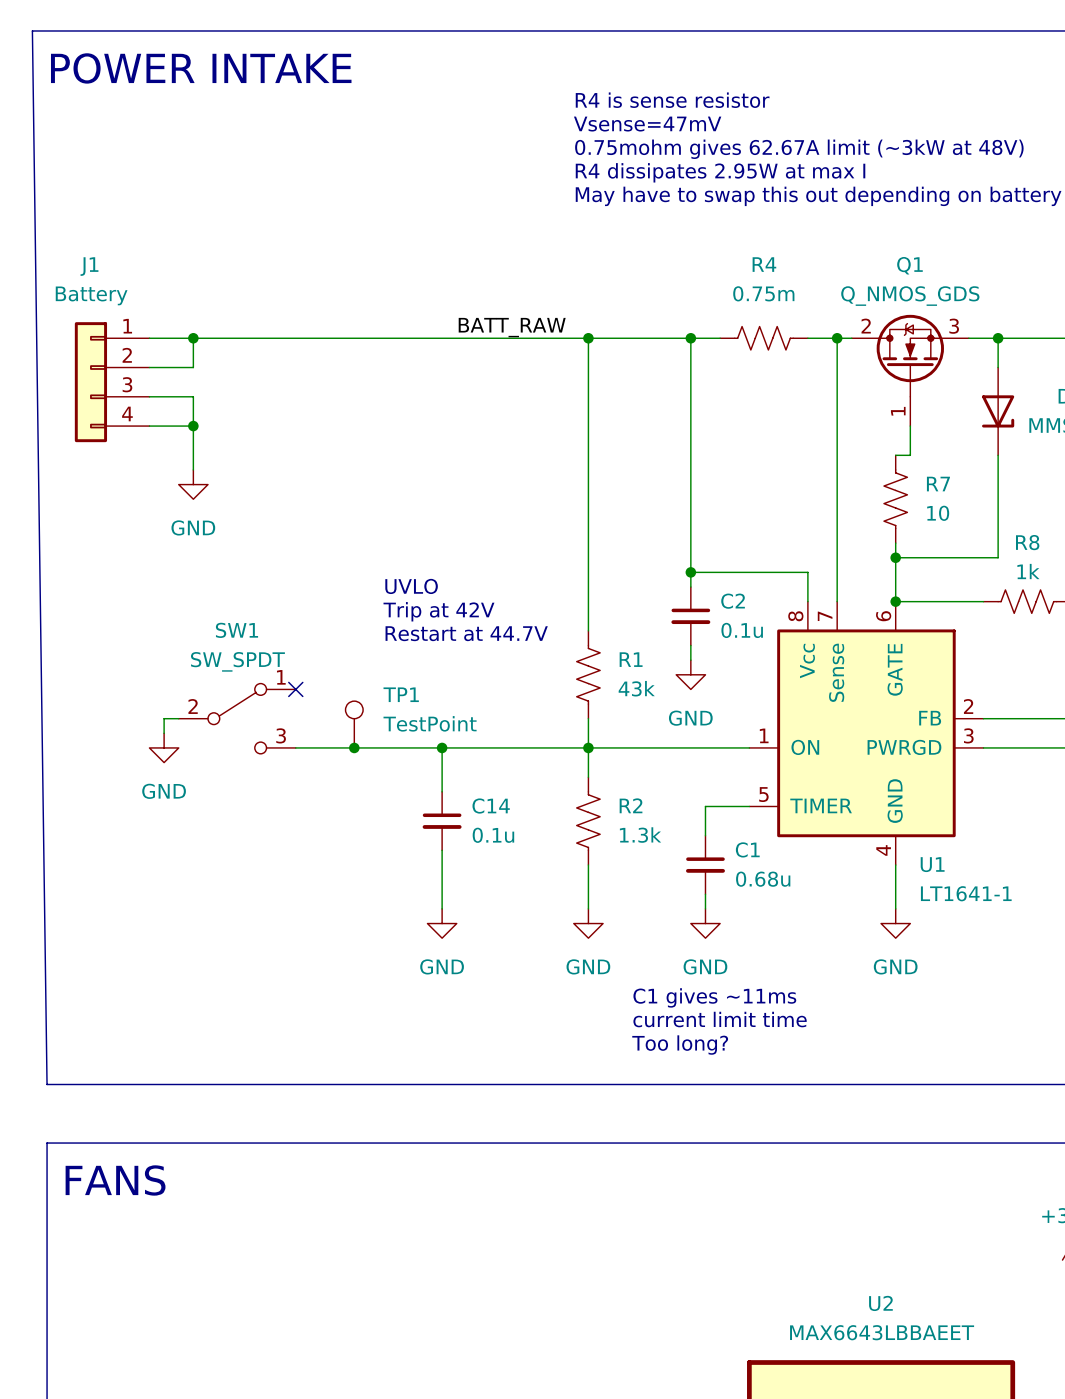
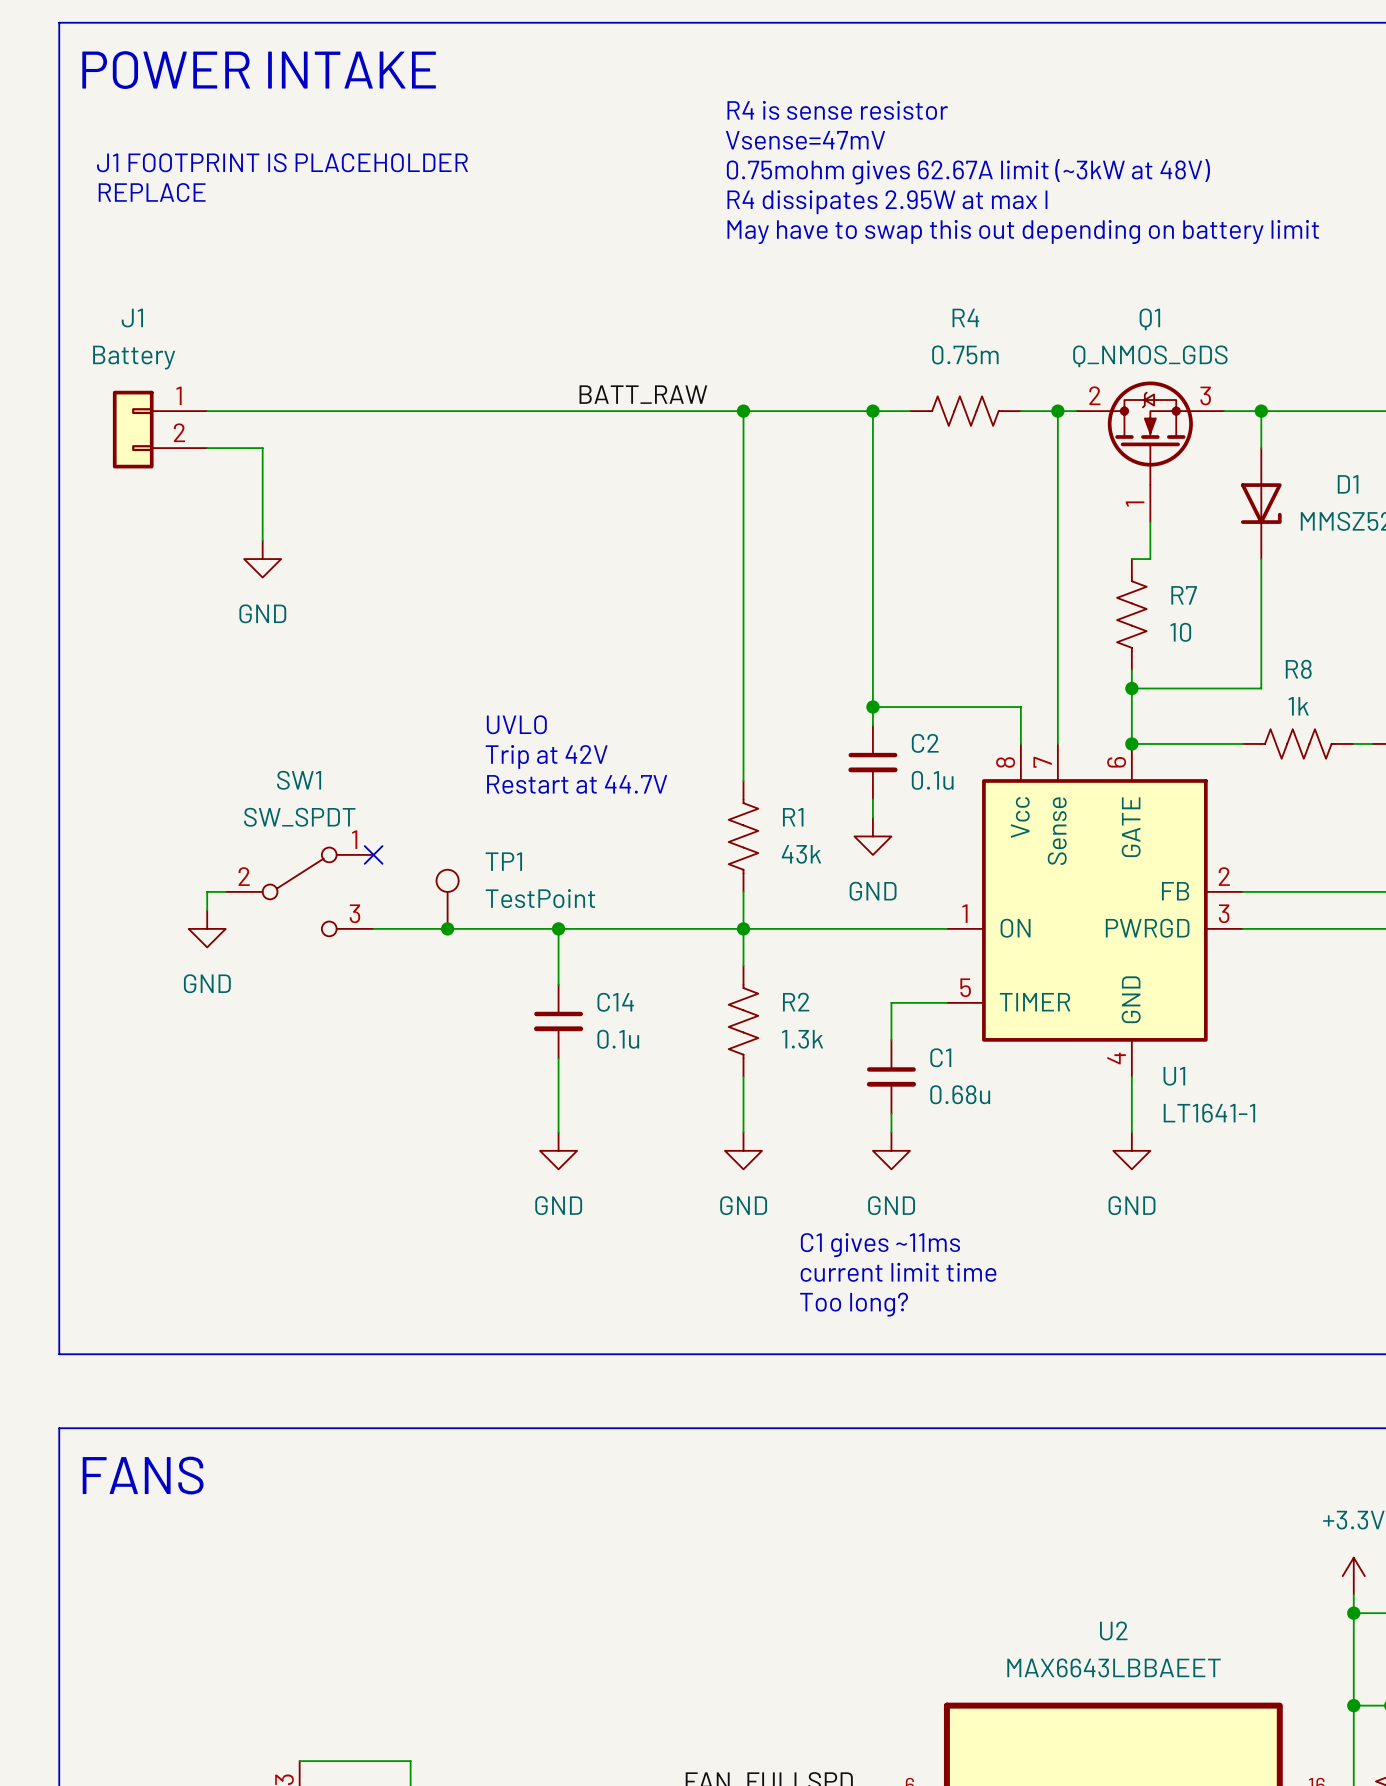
line: (47, 30) (32, 30) (47, 1084) -> (59, 22) (59, 1354)
text position: POWER INTAKE (201, 68) -> POWER INTAKE (259, 70)
text: none -> J1 FOOTPRINT IS PLACEHOLDER (282, 162)
text: none -> REPLACE (152, 192)
J1 name position: J1 (89, 266) -> J1 (132, 318)
J1 value position: Battery (91, 295) -> Battery (134, 357)
J1 symbol: [74, 322, 150, 443] -> [112, 390, 208, 469]
wire: (193, 338) (193, 367) -> (262, 540) (262, 448) (244, 448)
junction: (193, 338) -> none
wire: (149, 396) (193, 396) (193, 469) -> none
wire: (149, 426) (193, 426) -> none
junction: (193, 426) -> none
power symbol position: GND (193, 484) -> GND (262, 559)

